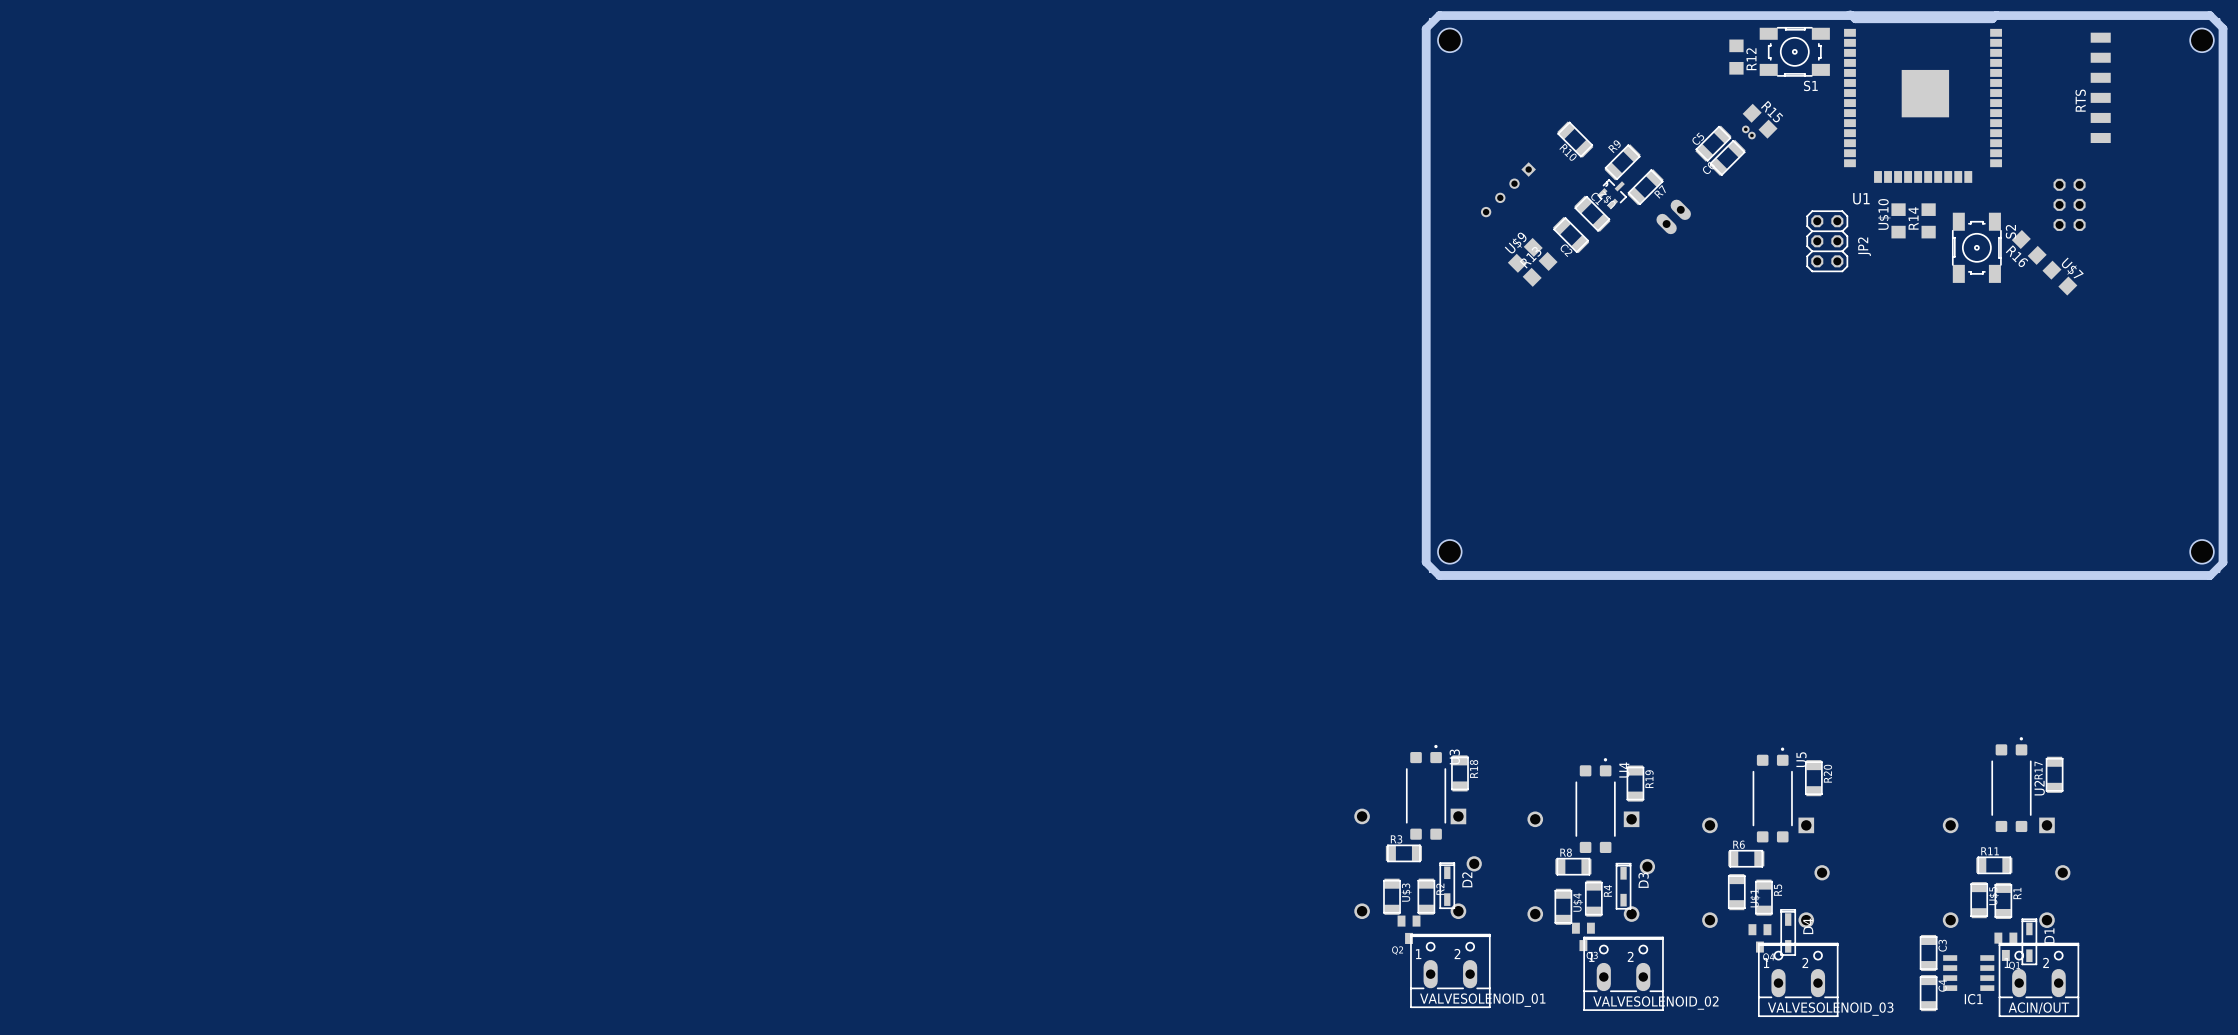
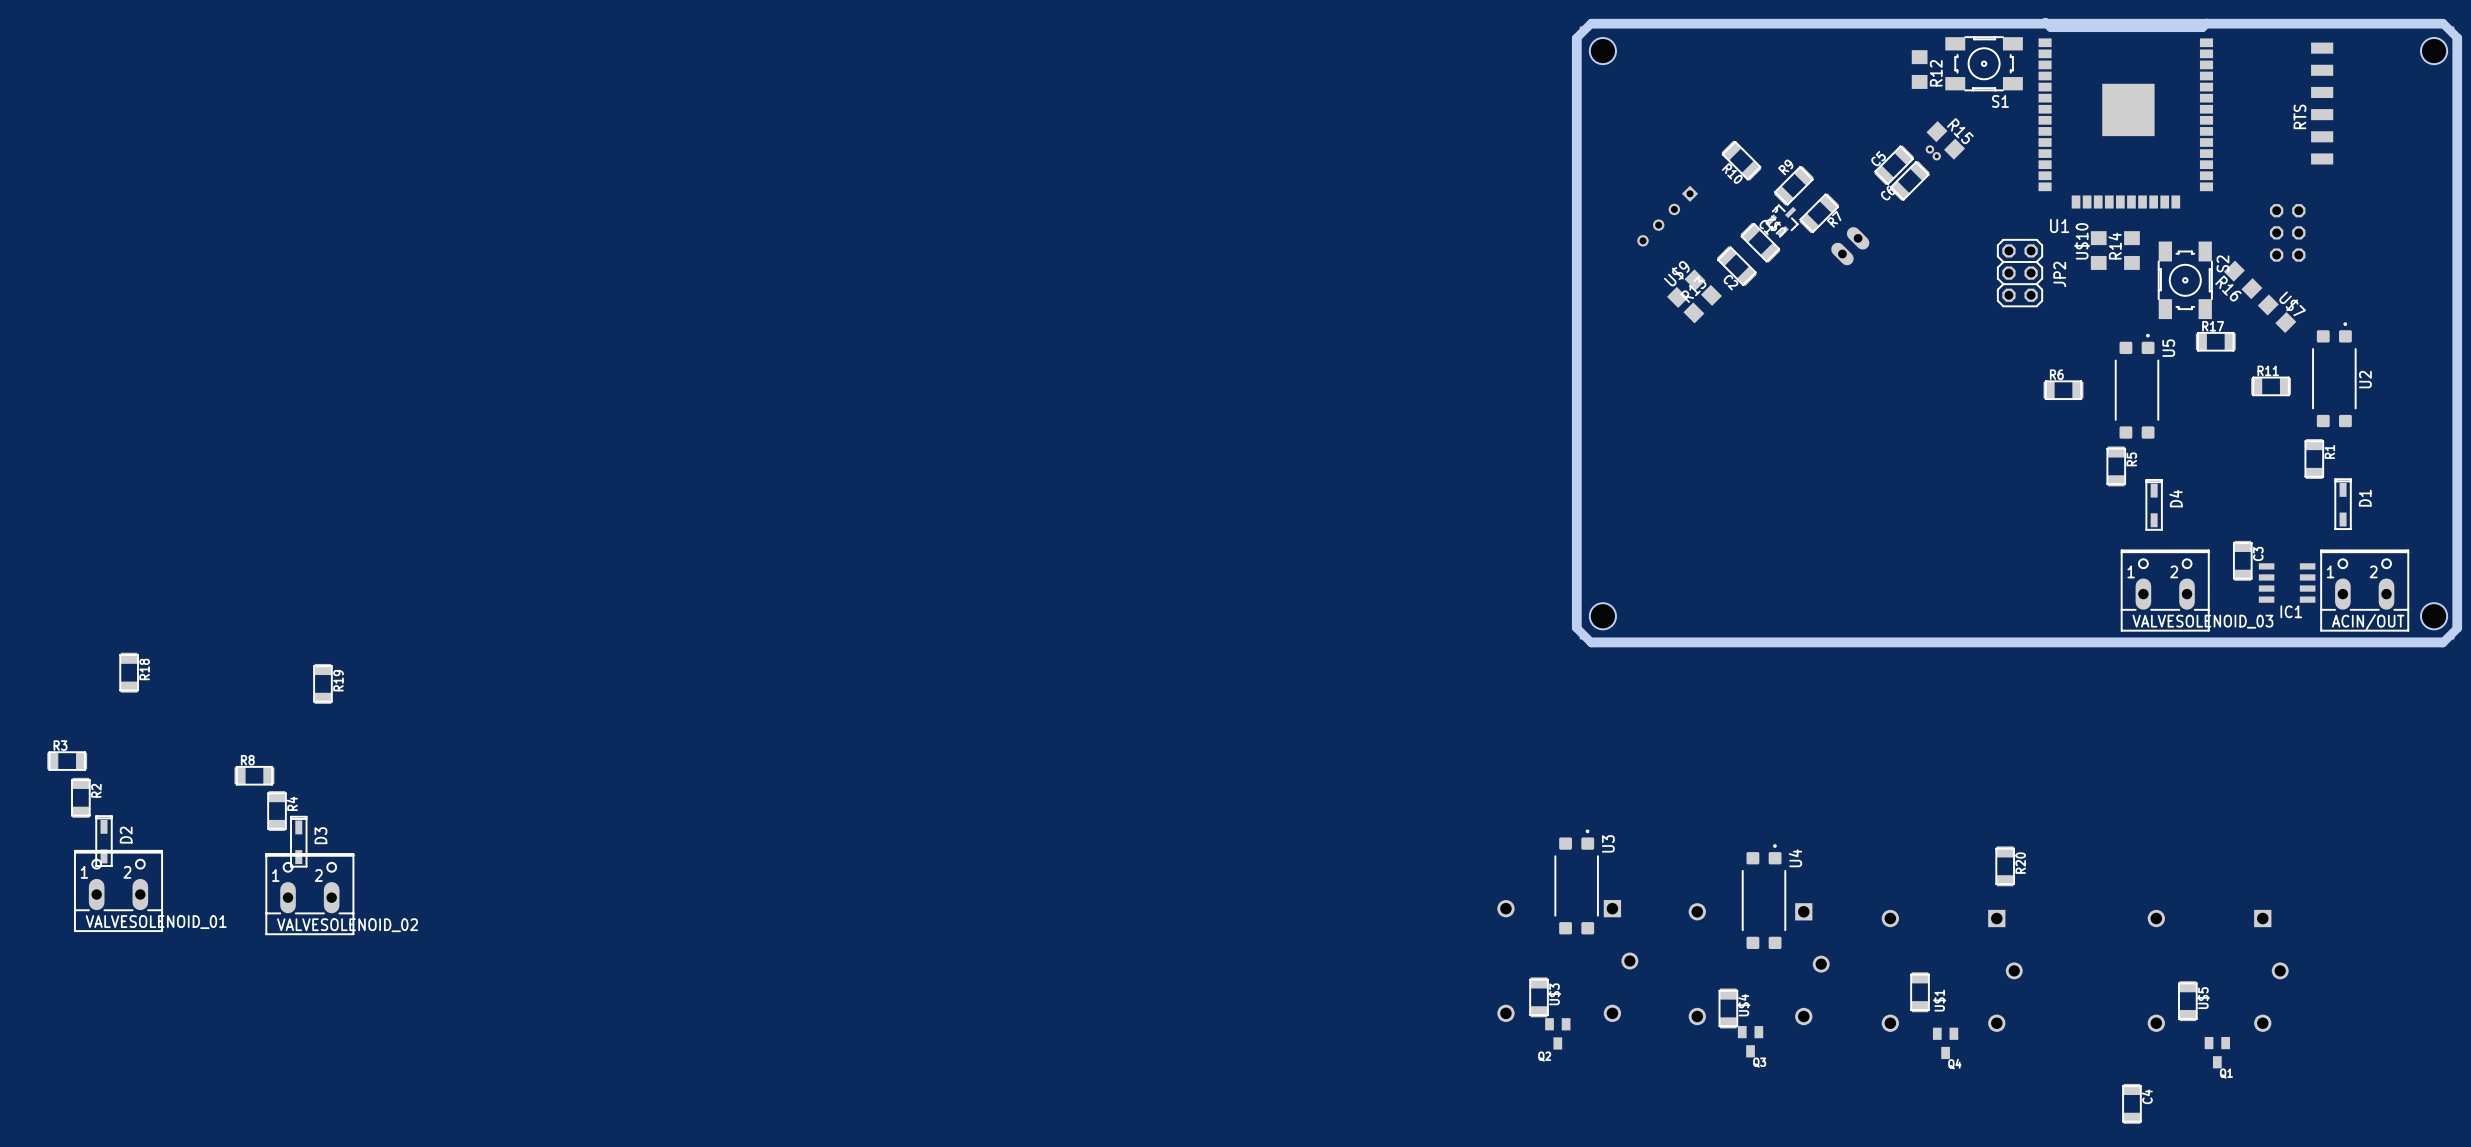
ACIN/OUT: none -> (2364, 590)
R18 position: (1459, 773) -> (129, 672)
R17 rotation: 0° (2054, 774) -> 90° clockwise (2215, 341)
R17 position: (2054, 774) -> (2215, 341)
R19 position: (1635, 783) -> (322, 683)
U2 position: (2011, 784) -> (2334, 374)
U5 position: (1772, 795) -> (2137, 386)
R3 position: (1403, 853) -> (67, 761)
R6 position: (1746, 858) -> (2063, 390)
R11 position: (1994, 865) -> (2271, 386)
R8 position: (1573, 866) -> (254, 775)
D2 position: (1447, 885) -> (104, 841)
D3 position: (1623, 886) -> (298, 841)
R2 position: (1426, 896) -> (80, 797)
R5 position: (1763, 897) -> (2116, 466)
R4 position: (1593, 898) -> (277, 811)
R1 position: (2003, 900) -> (2314, 459)
D4 position: (1788, 932) -> (2154, 504)
D1 position: (2029, 941) -> (2343, 504)
C3 position: (1928, 953) -> (2242, 560)
VALVESOLENOID_01 position: (1450, 970) -> (118, 890)
VALVESOLENOID_02 position: (1623, 973) -> (309, 894)
IC1 position: (1968, 973) -> (2287, 583)
VALVESOLENOID_03 position: (1798, 979) -> (2165, 590)
ACIN/OUT: (2038, 979) -> none

